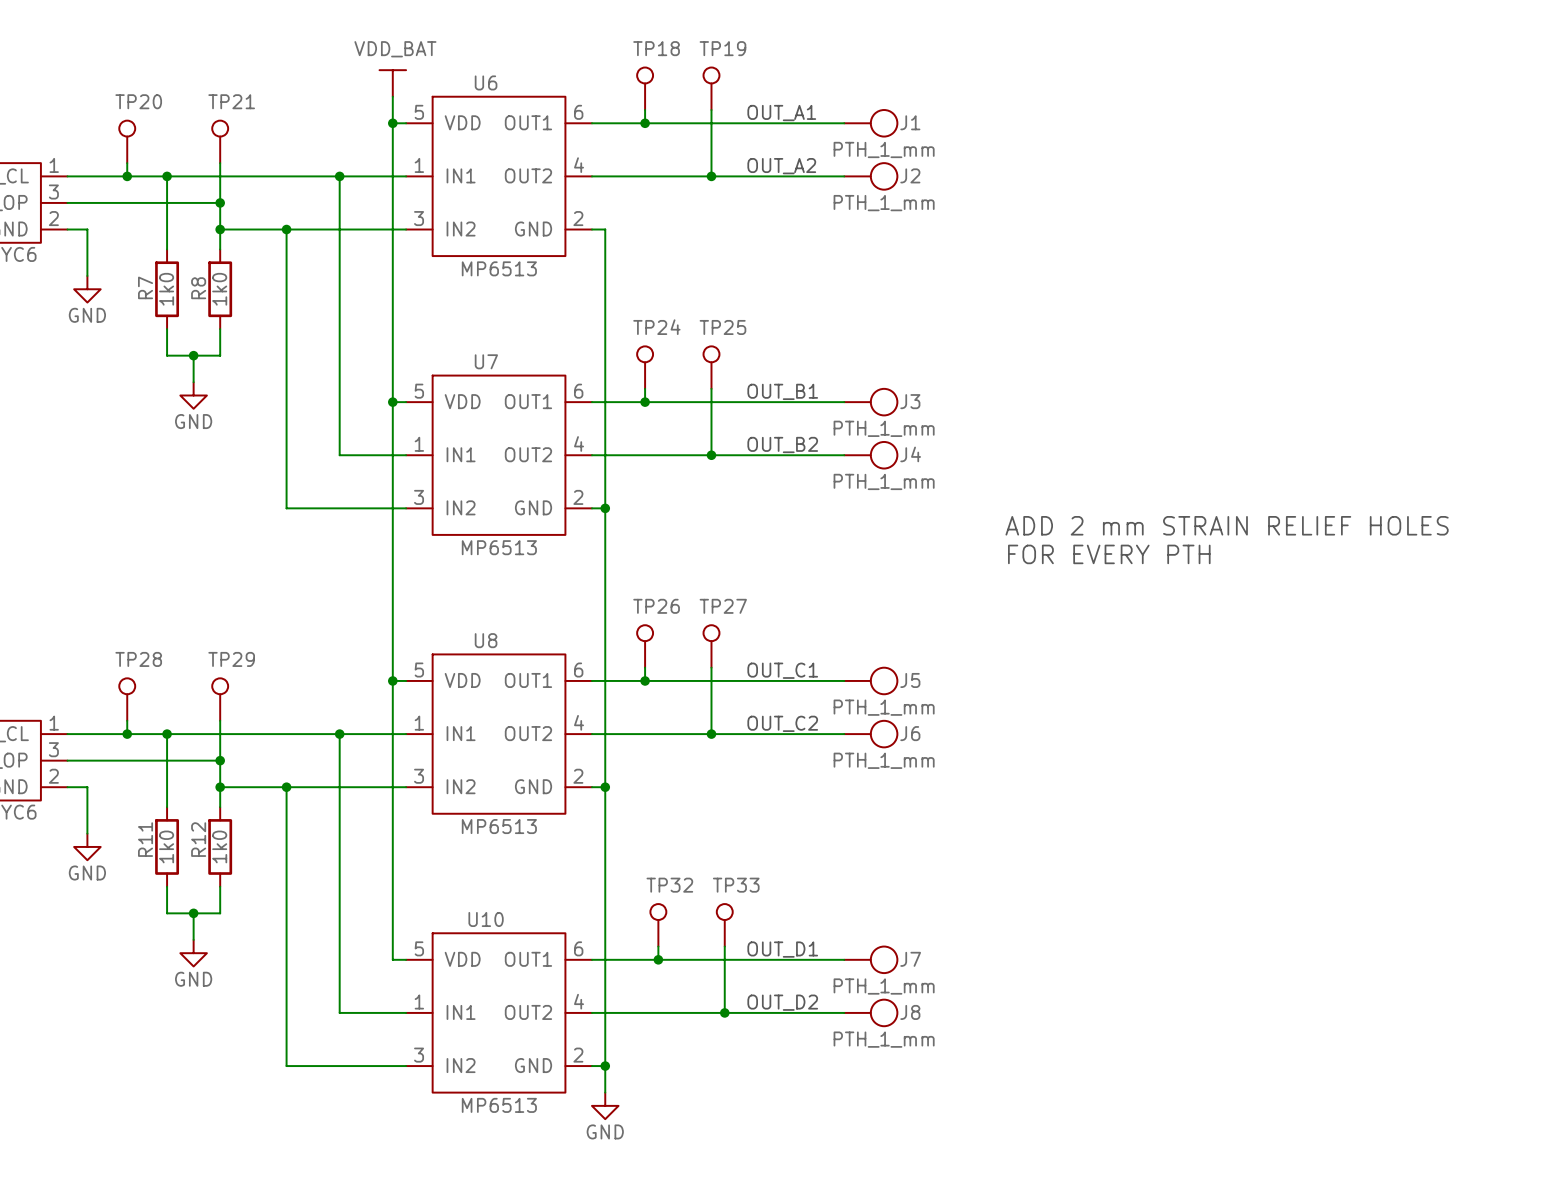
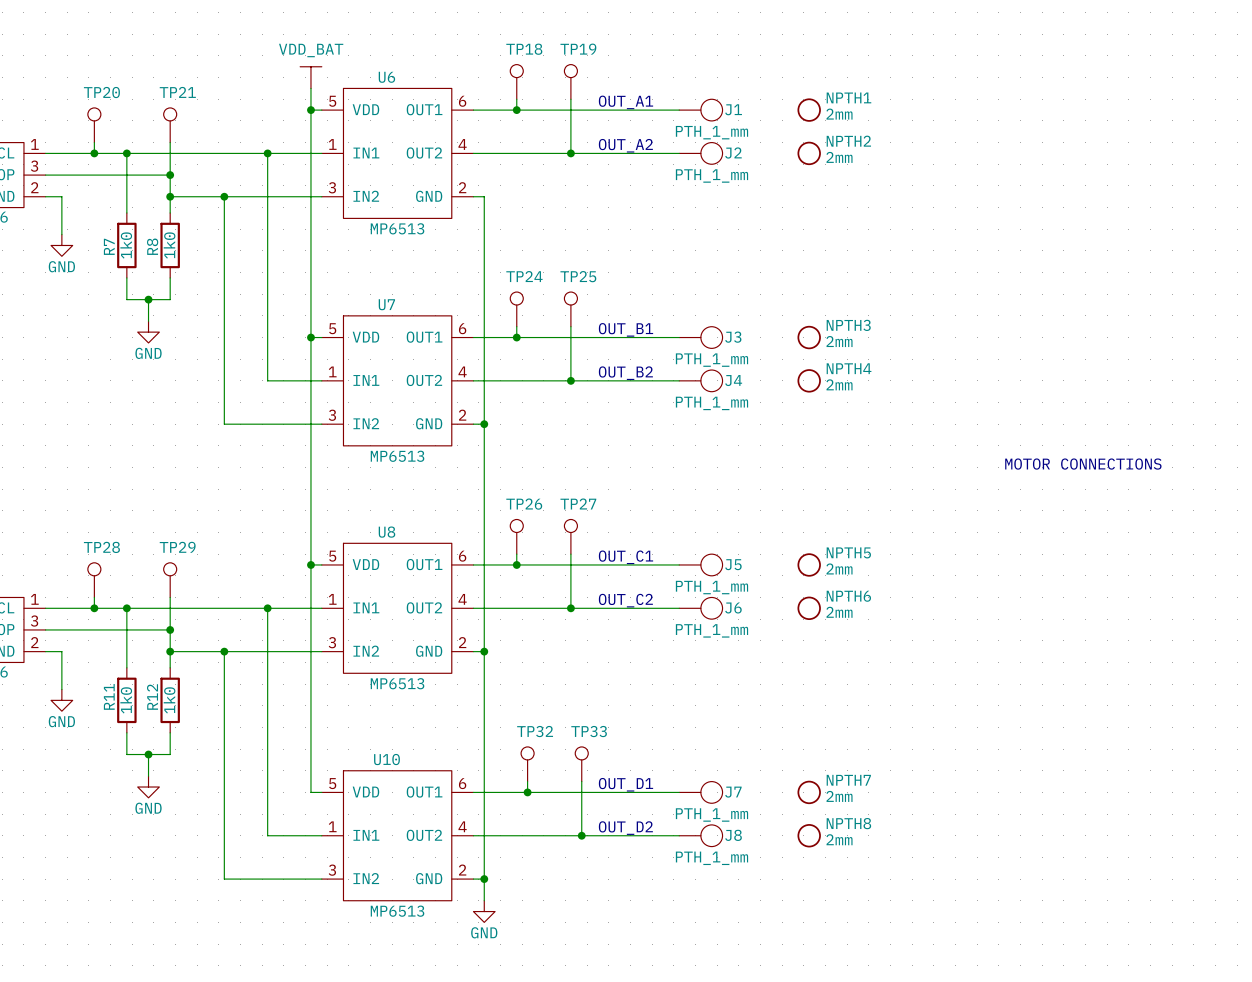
NPTH1: none -> (809, 110)
NPTH2: none -> (809, 153)
NPTH3: none -> (809, 337)
NPTH4: none -> (809, 380)
text: ADD 2 mm STRAIN RELIEF HOLES (1227, 525) -> none
text: FOR EVERY PTH (1109, 554) -> none
text: none -> MOTOR CONNECTIONS (1083, 464)
NPTH5: none -> (809, 564)
NPTH6: none -> (809, 608)
NPTH7: none -> (809, 792)
NPTH8: none -> (809, 835)

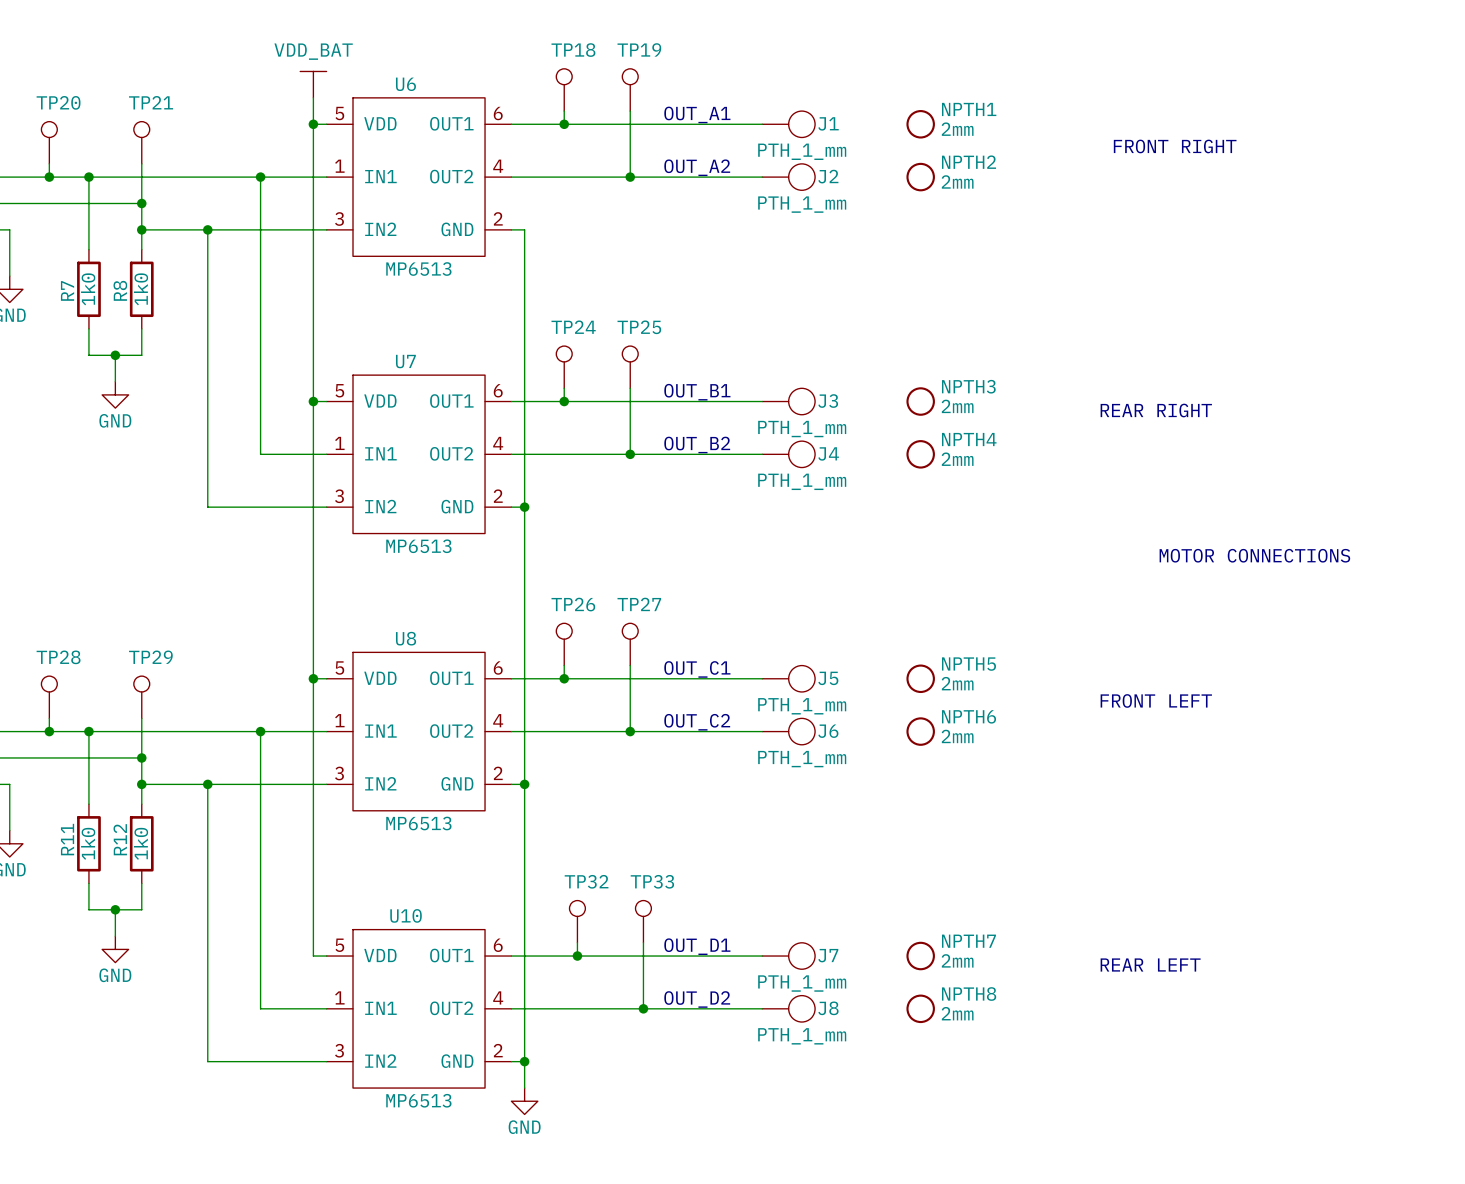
text: none -> FRONT RIGHT (1175, 146)
text: none -> REAR RIGHT (1156, 410)
text: none -> FRONT LEFT (1156, 700)
text: none -> REAR LEFT (1150, 965)

